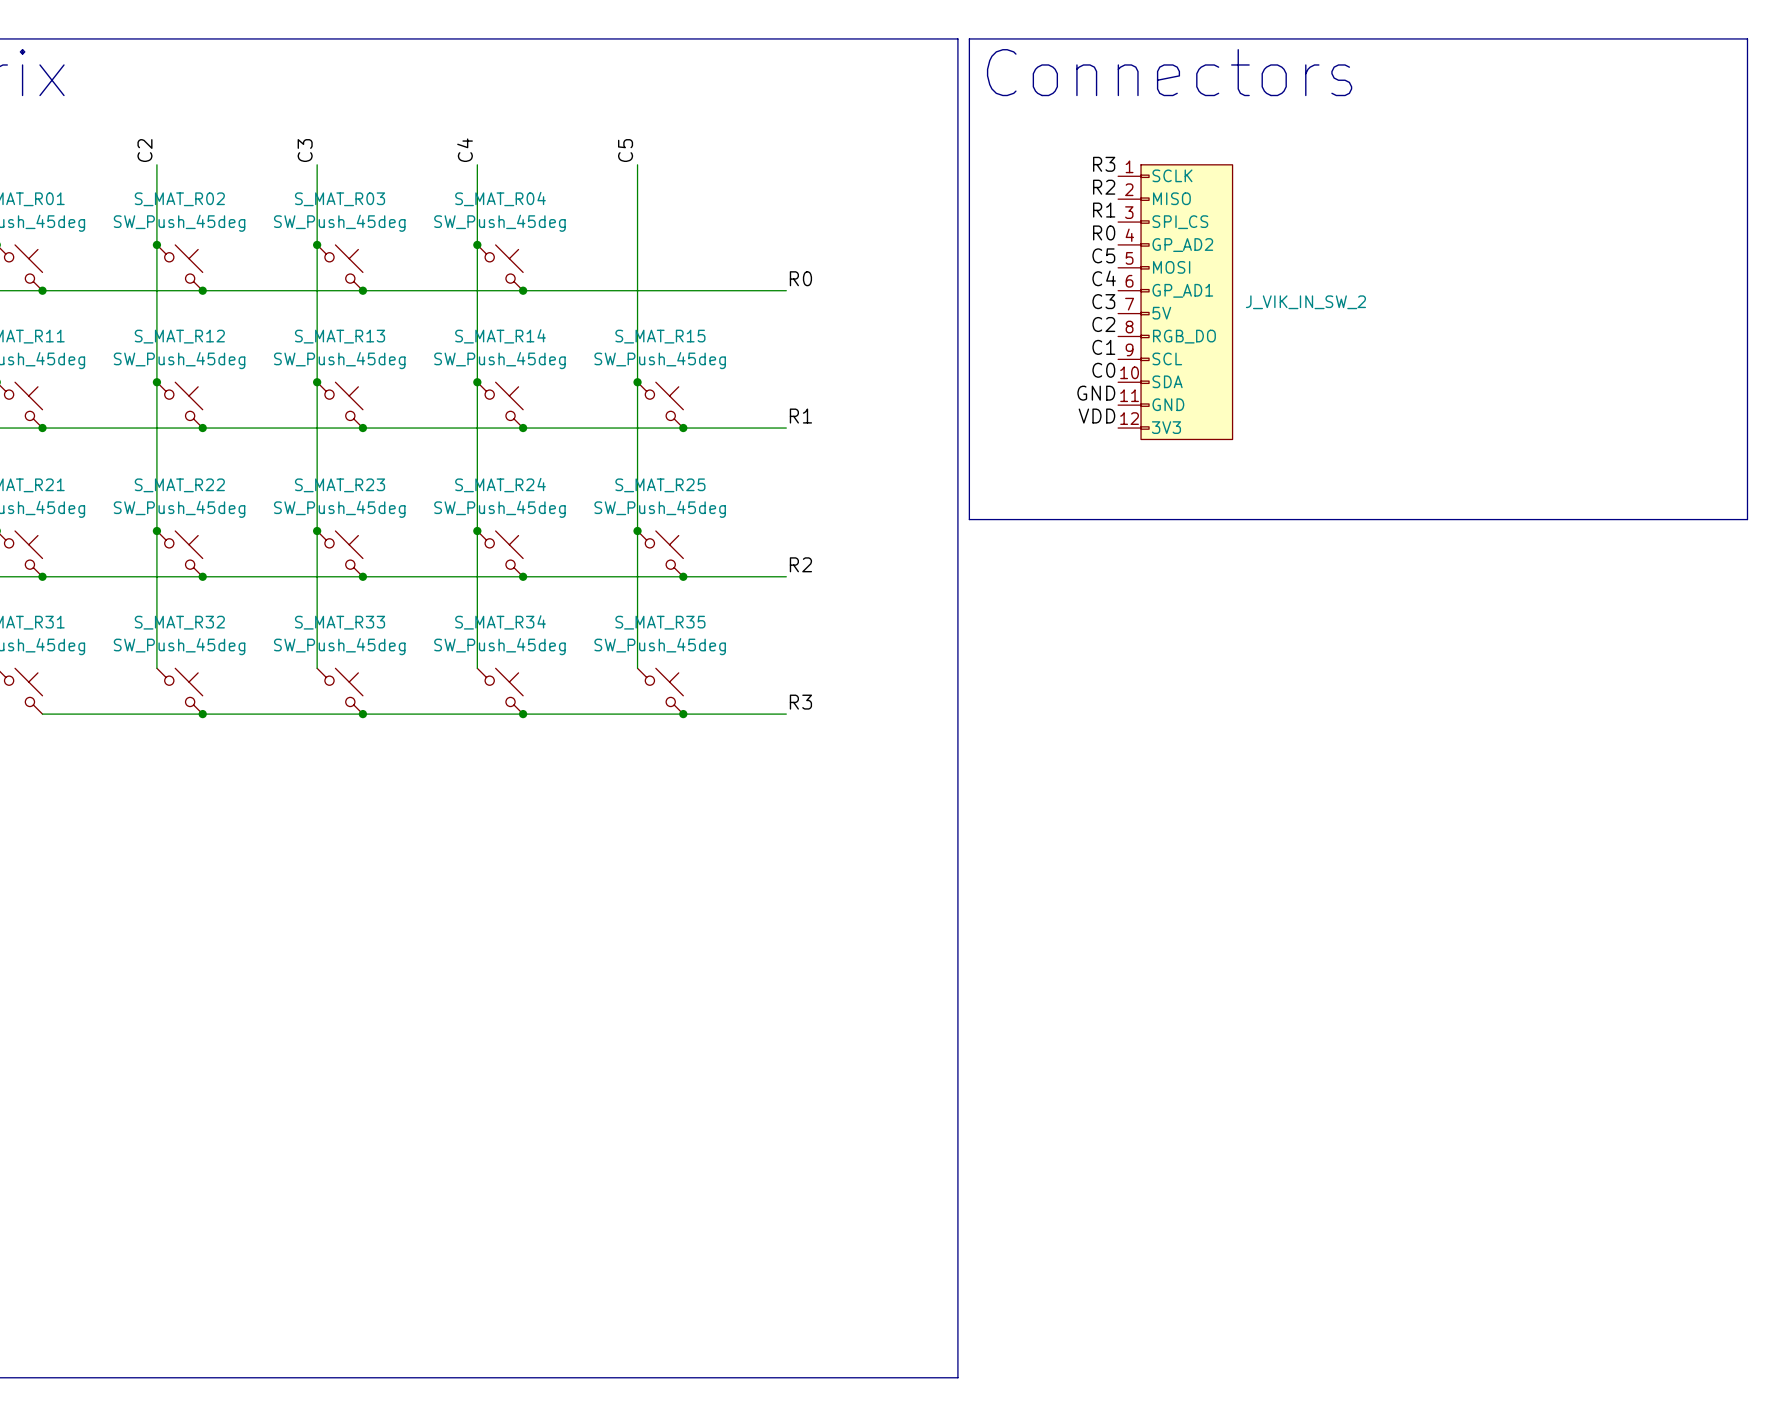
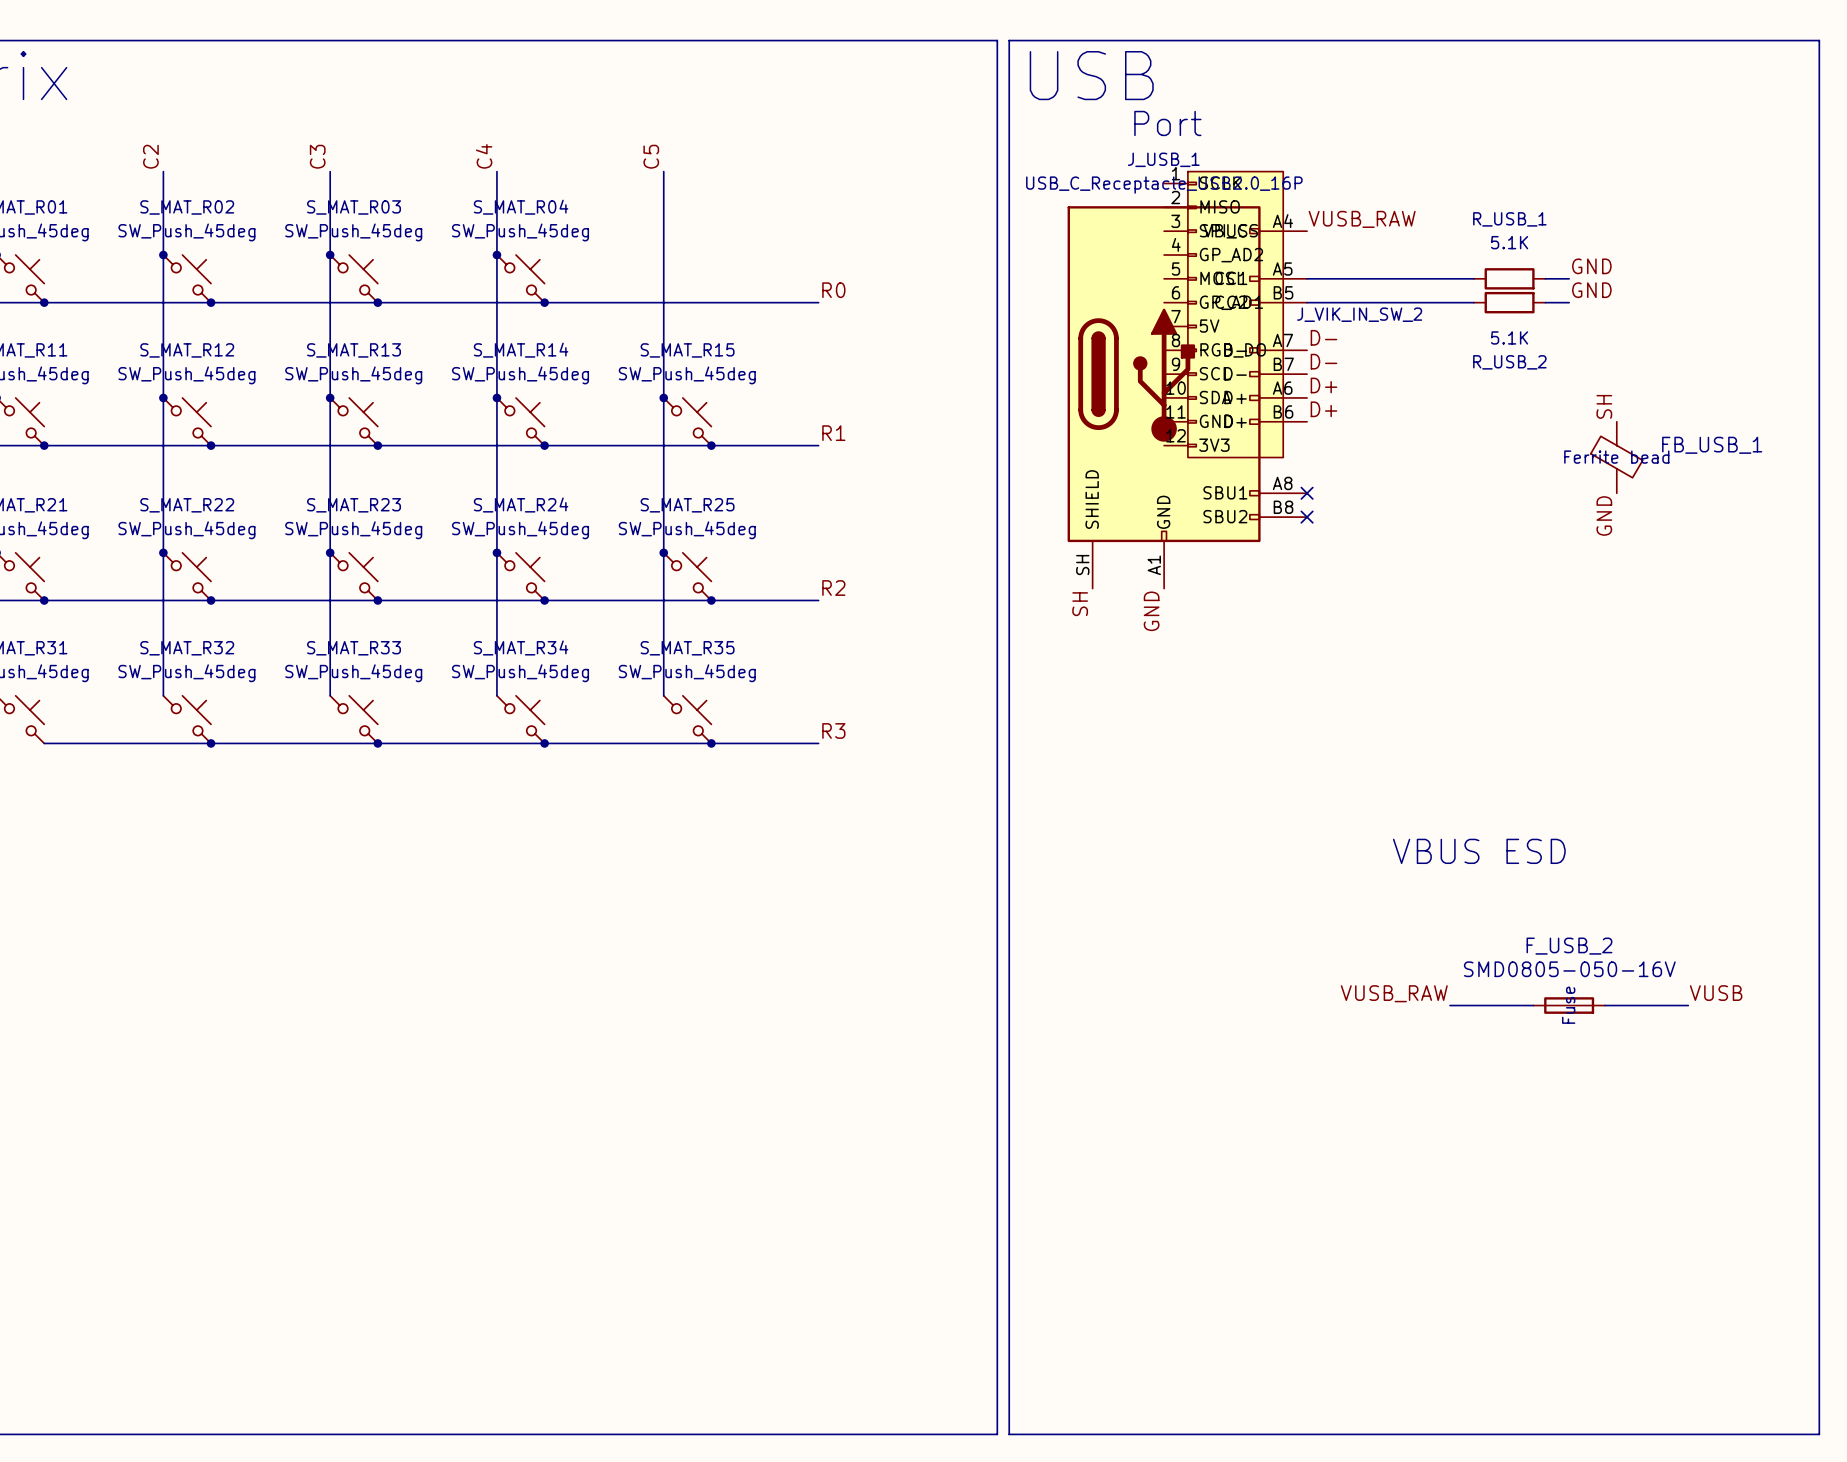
text: Connectors (1169, 72) -> USB (1091, 75)
text: none -> Port (1167, 123)
label: R3 (1104, 164) -> none
label: R2 (1104, 187) -> none
label: R1 (1104, 210) -> none
label: none -> VUSB_RAW (1362, 219)
label: R0 (1104, 232) -> none
label: C5 (1103, 255) -> none
label: none -> GND (1591, 266)
wire: none -> (1307, 278) (1473, 278)
R_USB_1: none -> 5.1K (1509, 278)
wire: none -> (1545, 278) (1569, 278)
label: C4 (1104, 278) -> none
label: none -> GND (1591, 290)
wire: none -> (1307, 302) (1473, 302)
R_USB_2: none -> 5.1K (1509, 302)
wire: none -> (1545, 302) (1569, 302)
label: C3 (1103, 301) -> none
label: C2 (1103, 324) -> none
label: none -> D- (1323, 337)
label: C1 (1103, 347) -> none
label: none -> D- (1323, 361)
label: C0 (1103, 370) -> none
label: none -> D+ (1323, 385)
J_USB_1: none -> USB_C_Receptacle_USB2.0_16P (1187, 397)
label: none -> SH (1604, 406)
label rotation: 0° (1096, 393) -> 90° counterclockwise (1151, 611)
label position: GND (1096, 393) -> GND (1151, 611)
label: none -> D+ (1323, 409)
label: VDD (1096, 416) -> none
FB_USB_1: none -> (1616, 457)
no-connect mark: none -> (1307, 493)
label: none -> GND (1604, 515)
no-connect mark: none -> (1307, 517)
line: (969, 519) (1747, 519) -> (1009, 540) (1009, 1434) (1819, 1434) (1819, 540)
label: none -> SH (1080, 604)
text: none -> VBUS ESD (1479, 851)
label: none -> VUSB (1716, 993)
label: none -> VUSB_RAW (1394, 993)
wire: none -> (1450, 1005) (1533, 1005)
F_USB_2: none -> SMD0805-050-16V (1569, 1005)
wire: none -> (1604, 1005) (1688, 1005)

